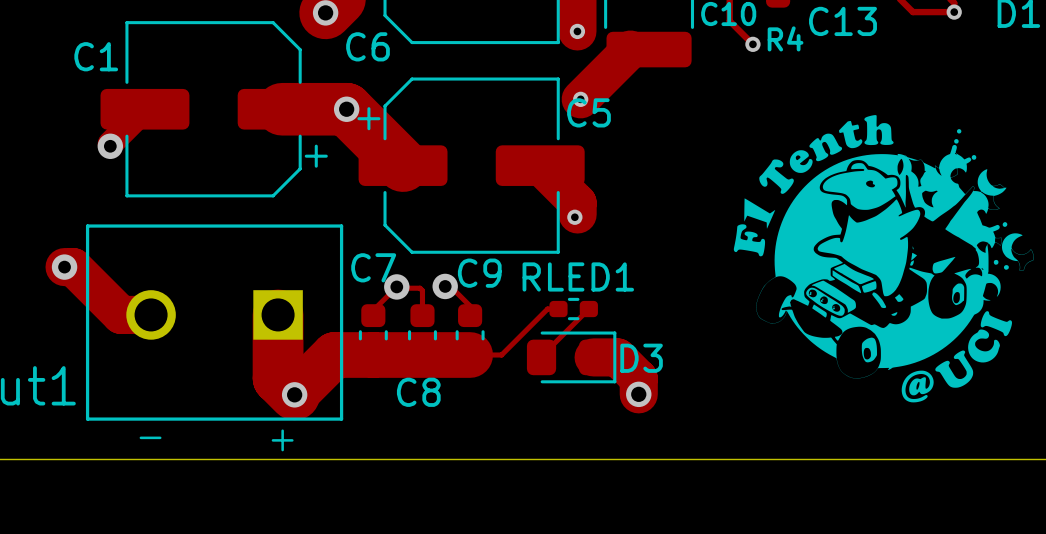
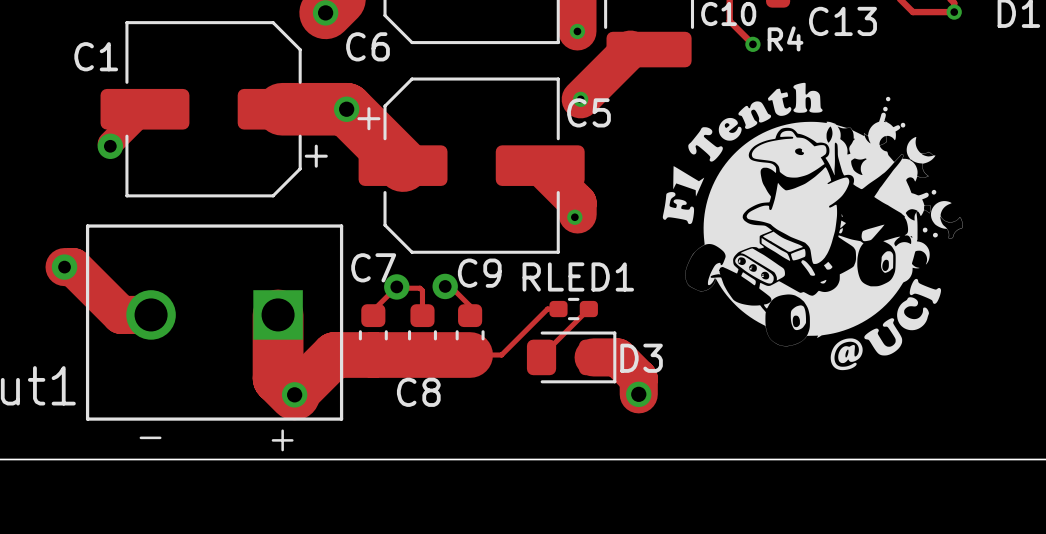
drawing position: (883, 258) -> (812, 226)

